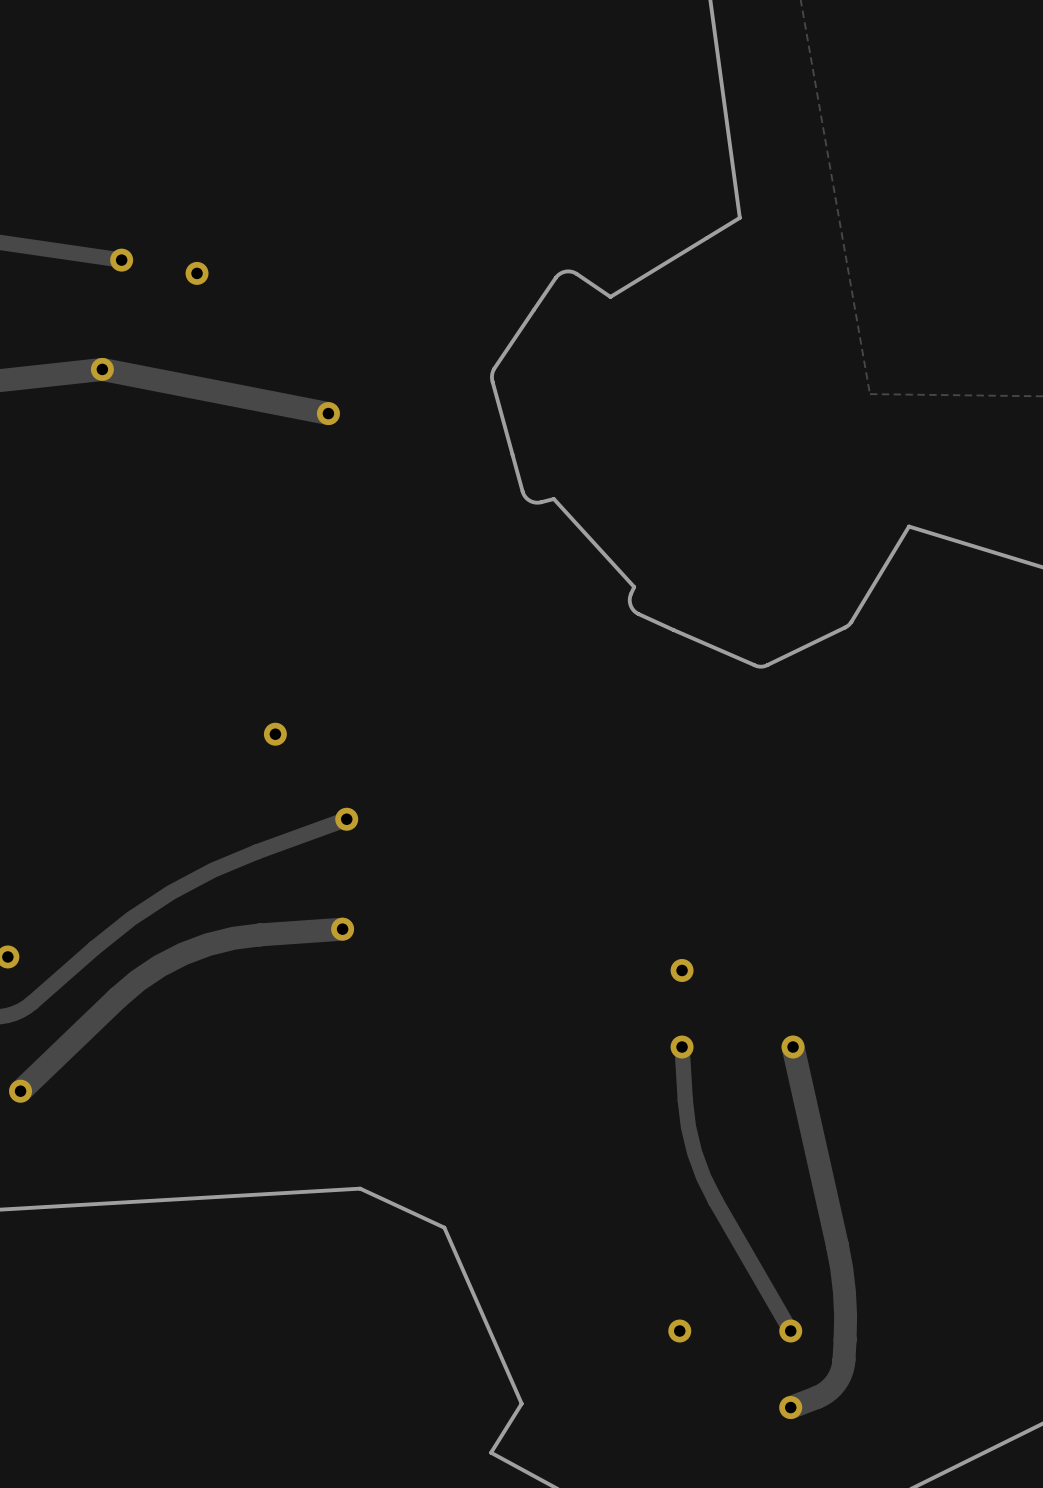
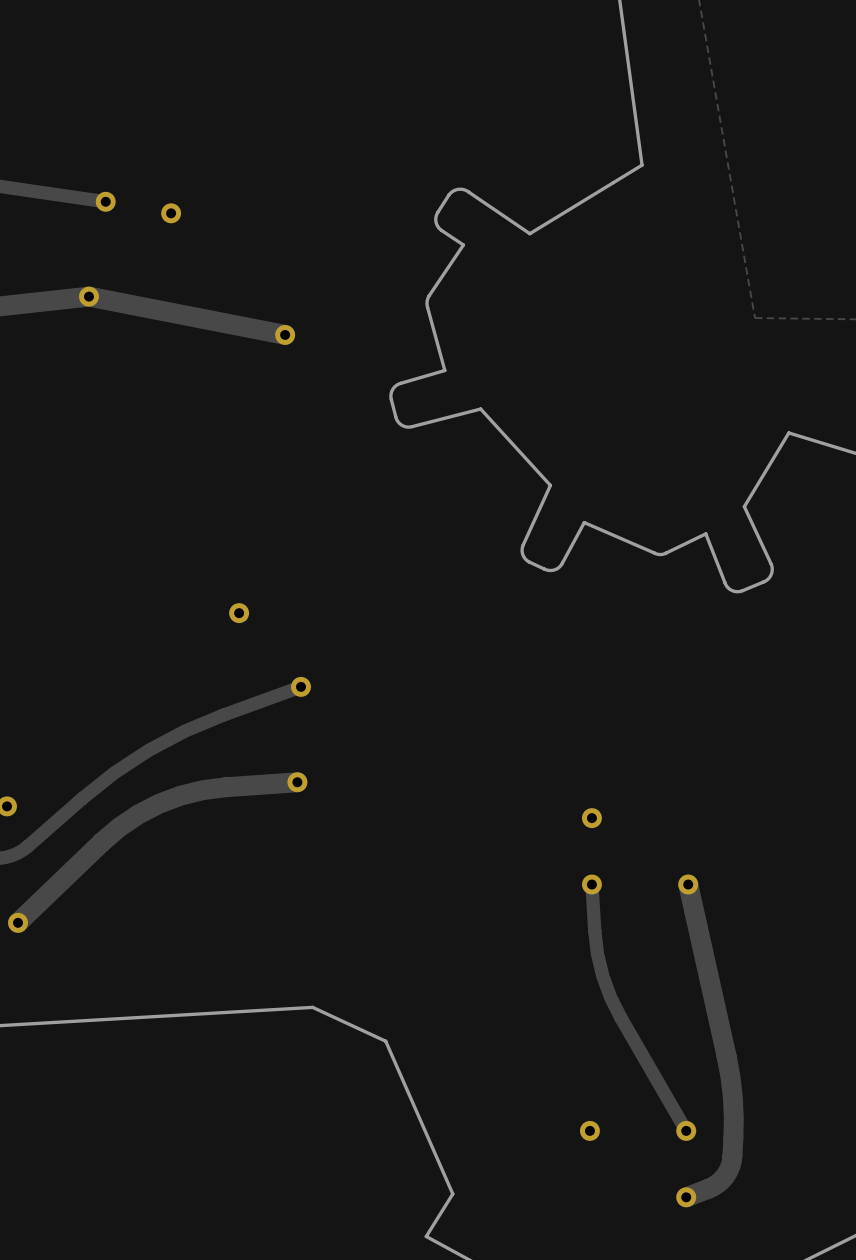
board edge: (576, 274) (567, 271) (558, 274) (533, 309) -> (500, 213) (466, 190) (458, 189) (451, 192) (437, 212) (435, 221) (440, 229) (463, 245)
board edge: (512, 454) (524, 495) (531, 501) (541, 502) -> (444, 370) (394, 386) (390, 397) (397, 420) (403, 425) (410, 426) (469, 411)
board edge: (631, 593) (630, 603) (635, 611) (673, 629) -> (547, 491) (522, 546) (522, 554) (526, 560) (547, 570) (557, 568) (561, 564) (584, 522)
board edge: (857, 611) (847, 626) (813, 642) -> (744, 506) (771, 565) (771, 573) (766, 580) (739, 591) (729, 588) (725, 584) (705, 533)

